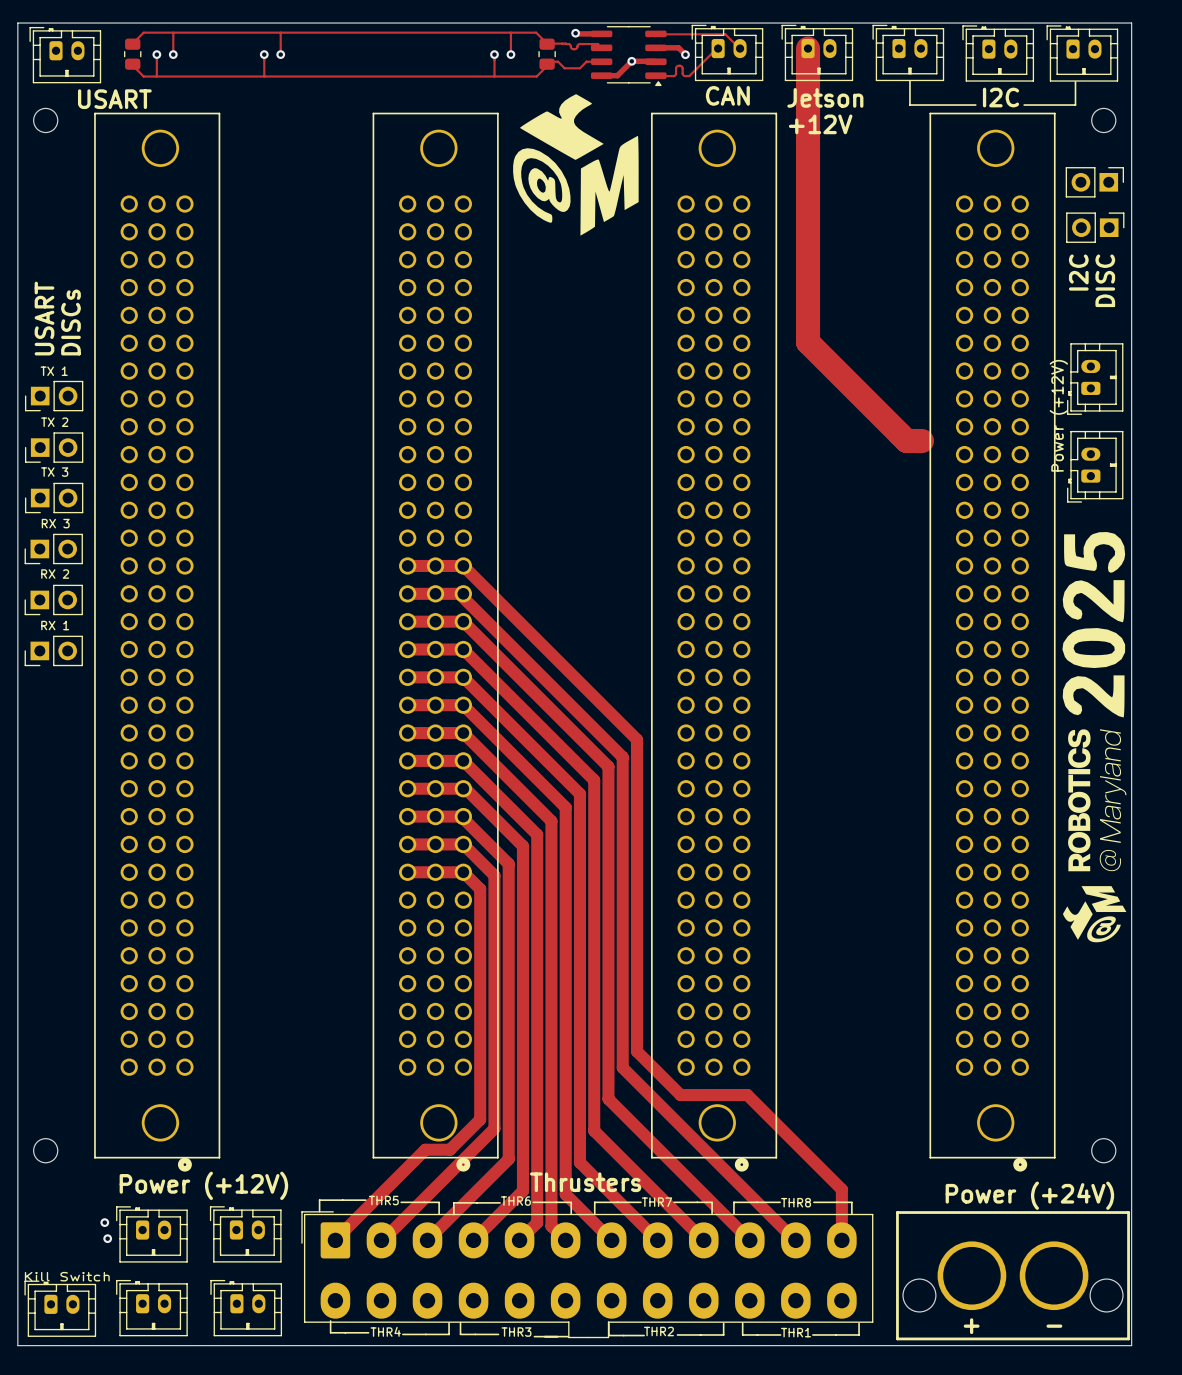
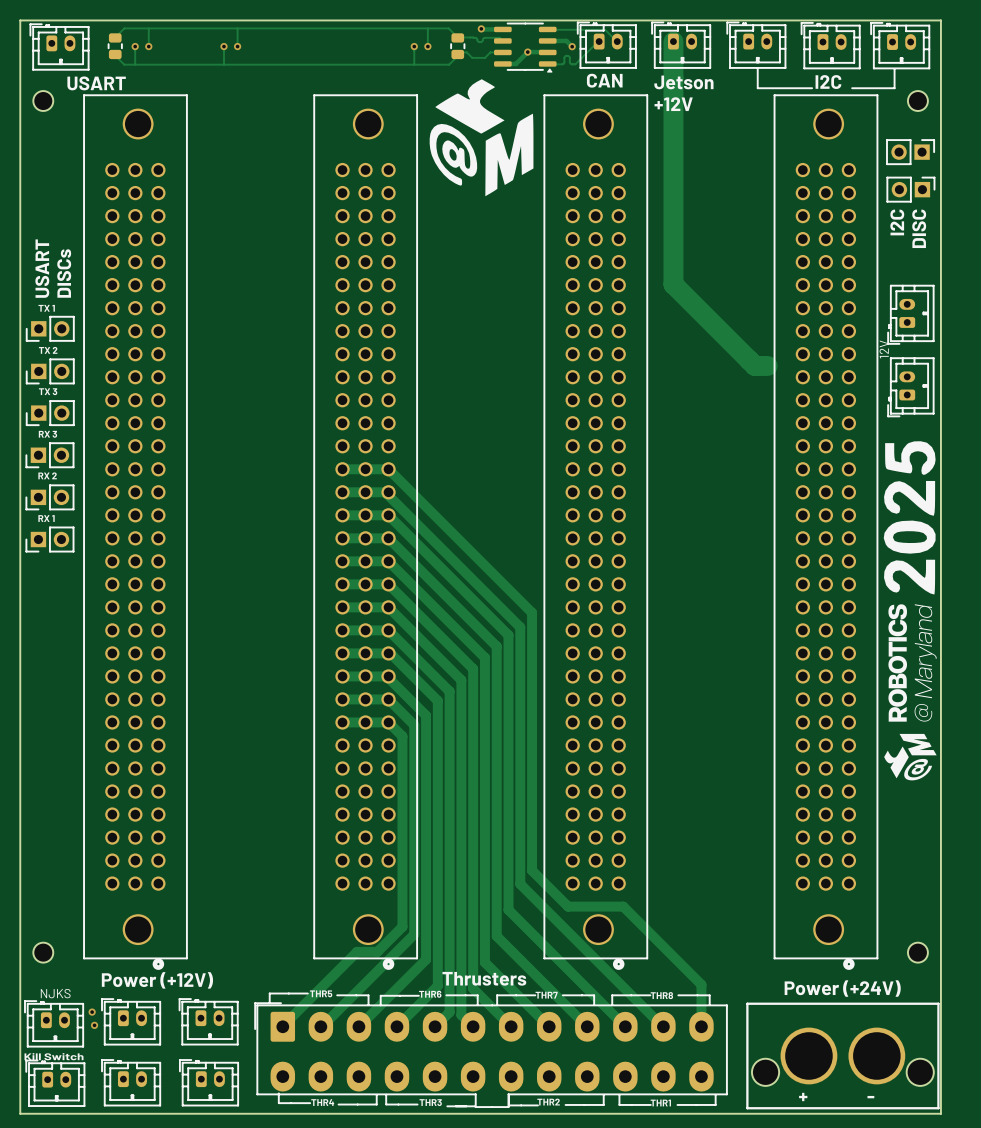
Power (+12V) name: Power (+12V) (1058, 415) -> 12V (884, 349)
NJKS: none -> (54, 1023)

